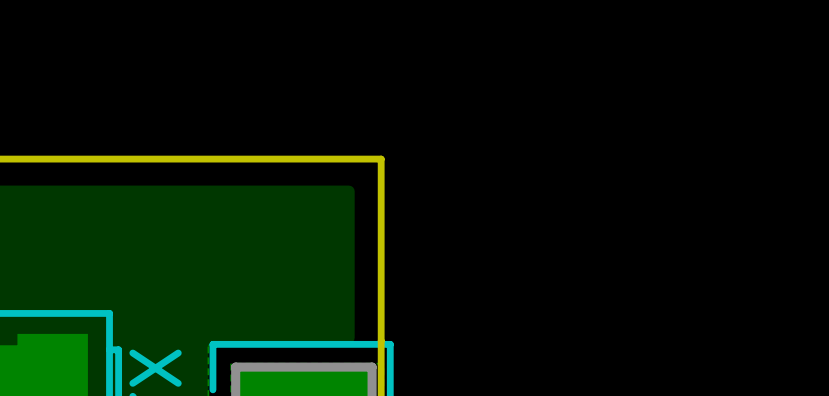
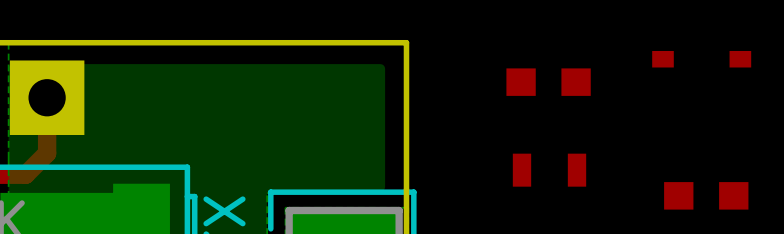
part: none -> (701, 59)
part: none -> (548, 82)
part: none -> (549, 170)
part: none -> (706, 195)

